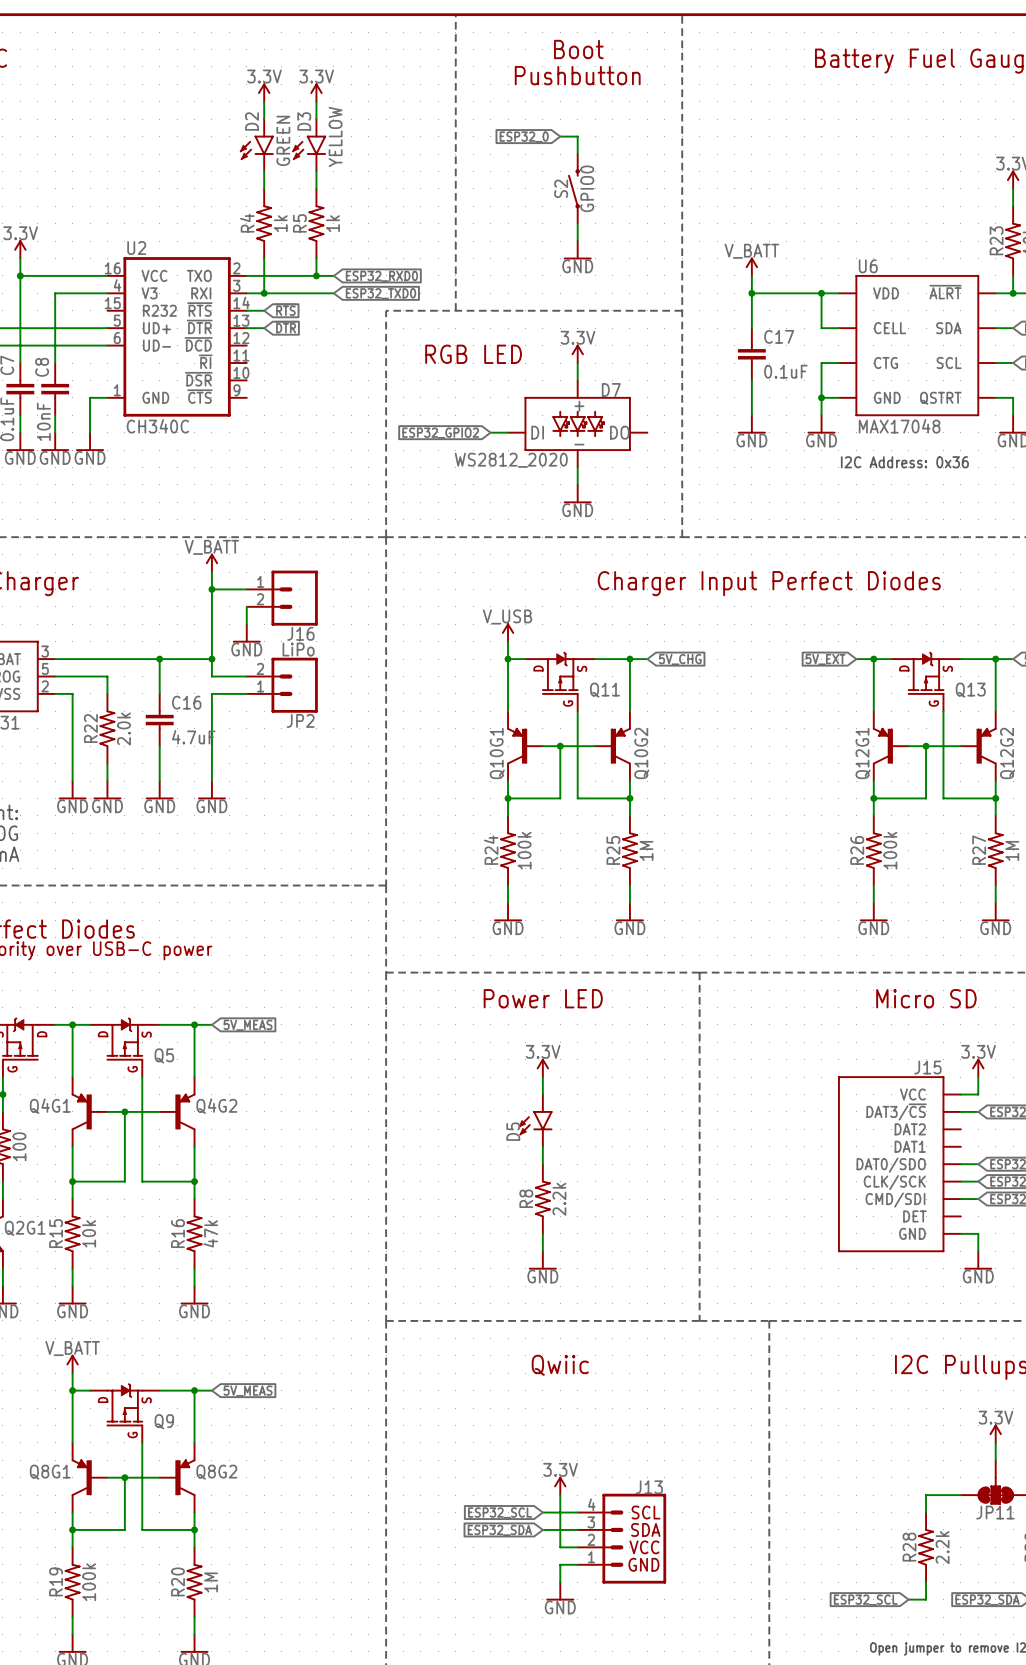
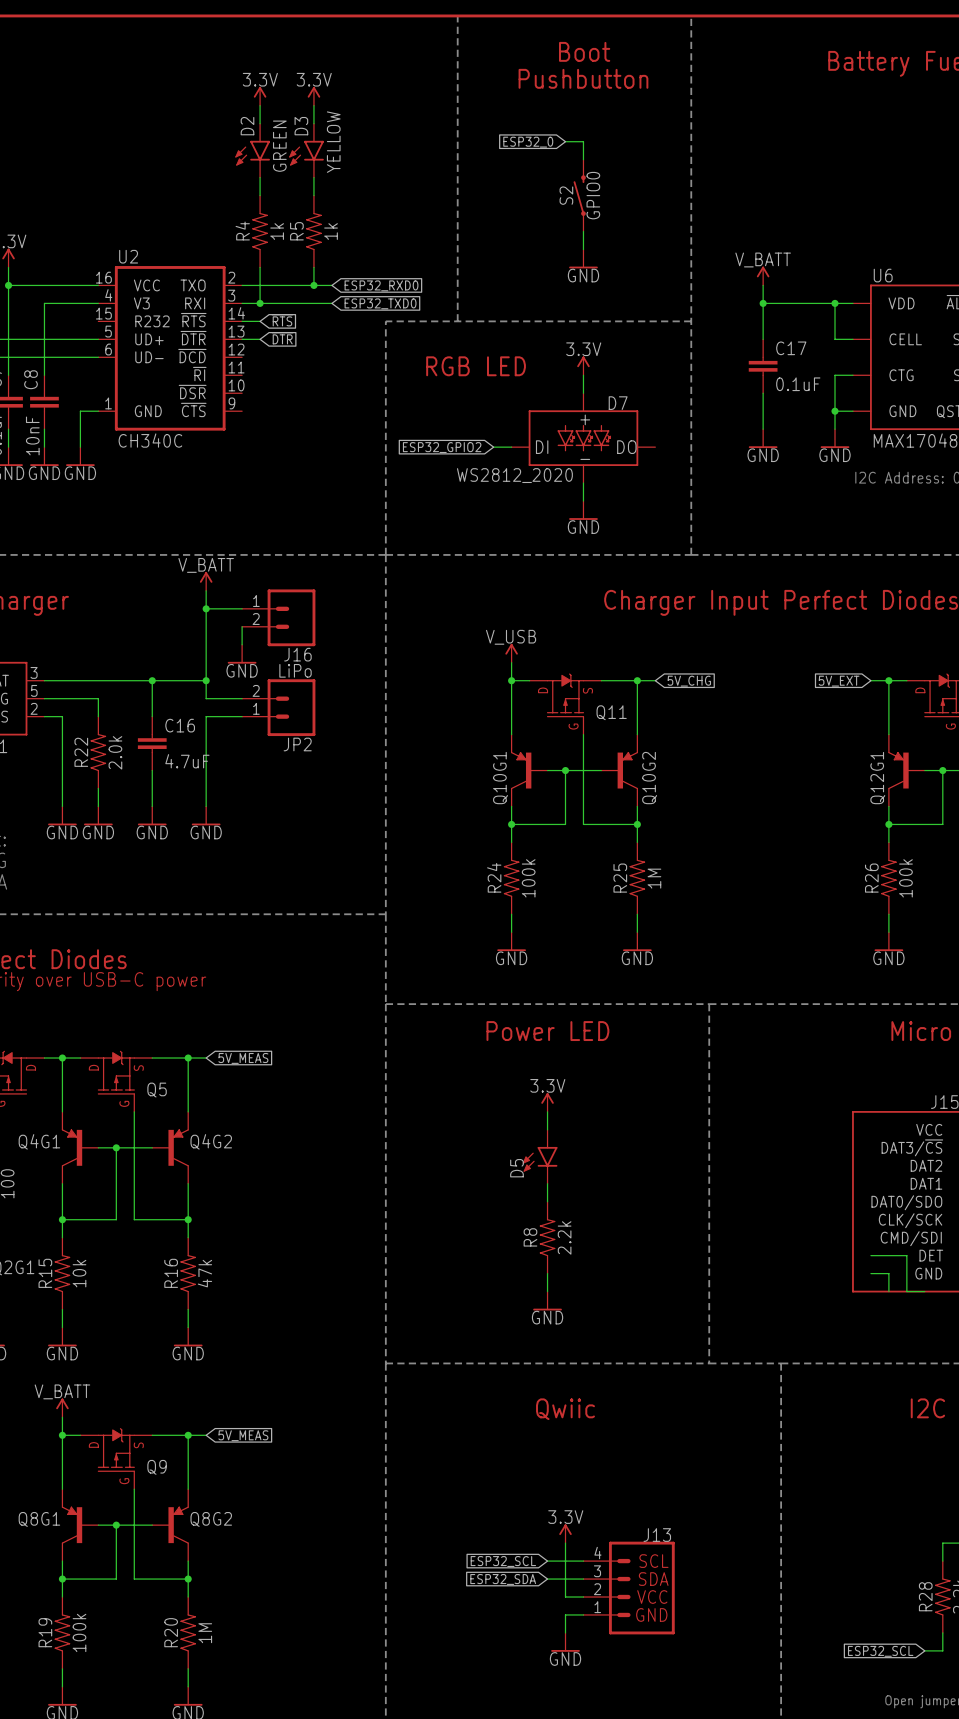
wire: none -> (870, 1255) (906, 1255) (906, 1291) (924, 1291)
wire: none -> (870, 1273) (888, 1273) (888, 1291)

